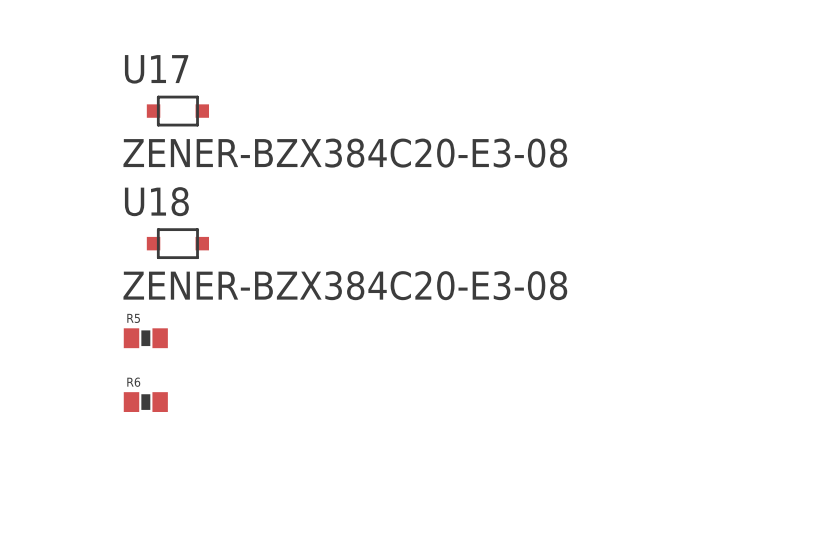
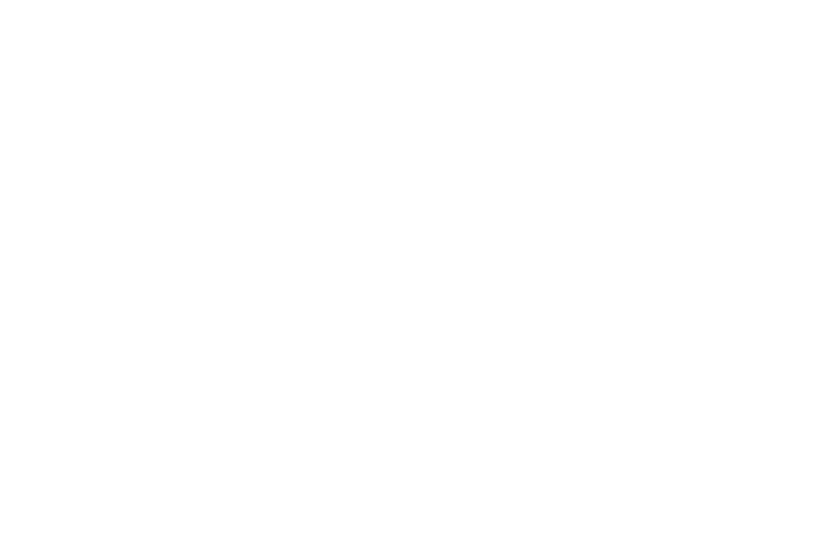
U17: ZENER-BZX384C20-E3-08 (177, 111) -> none
U18: ZENER-BZX384C20-E3-08 (177, 243) -> none
R5: (145, 338) -> none
R6: (145, 402) -> none

